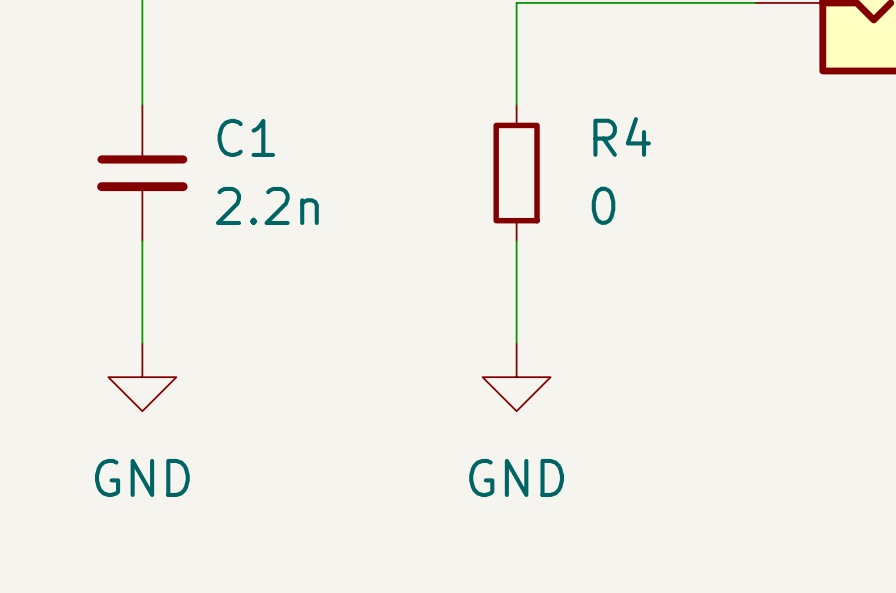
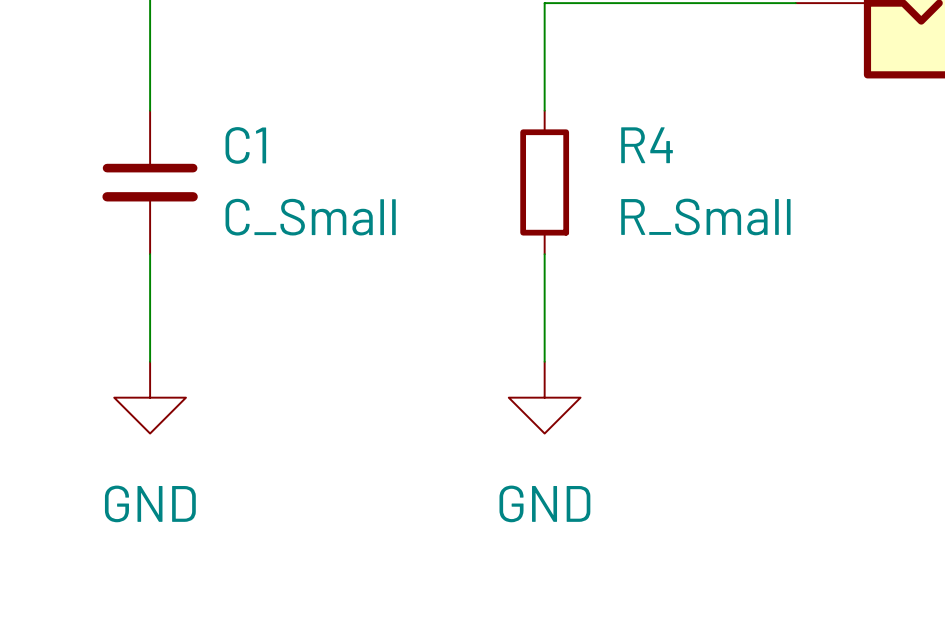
C1 value: 2.2n (267, 205) -> C_Small (310, 217)
R4 value: 0 (603, 205) -> R_Small (705, 216)

